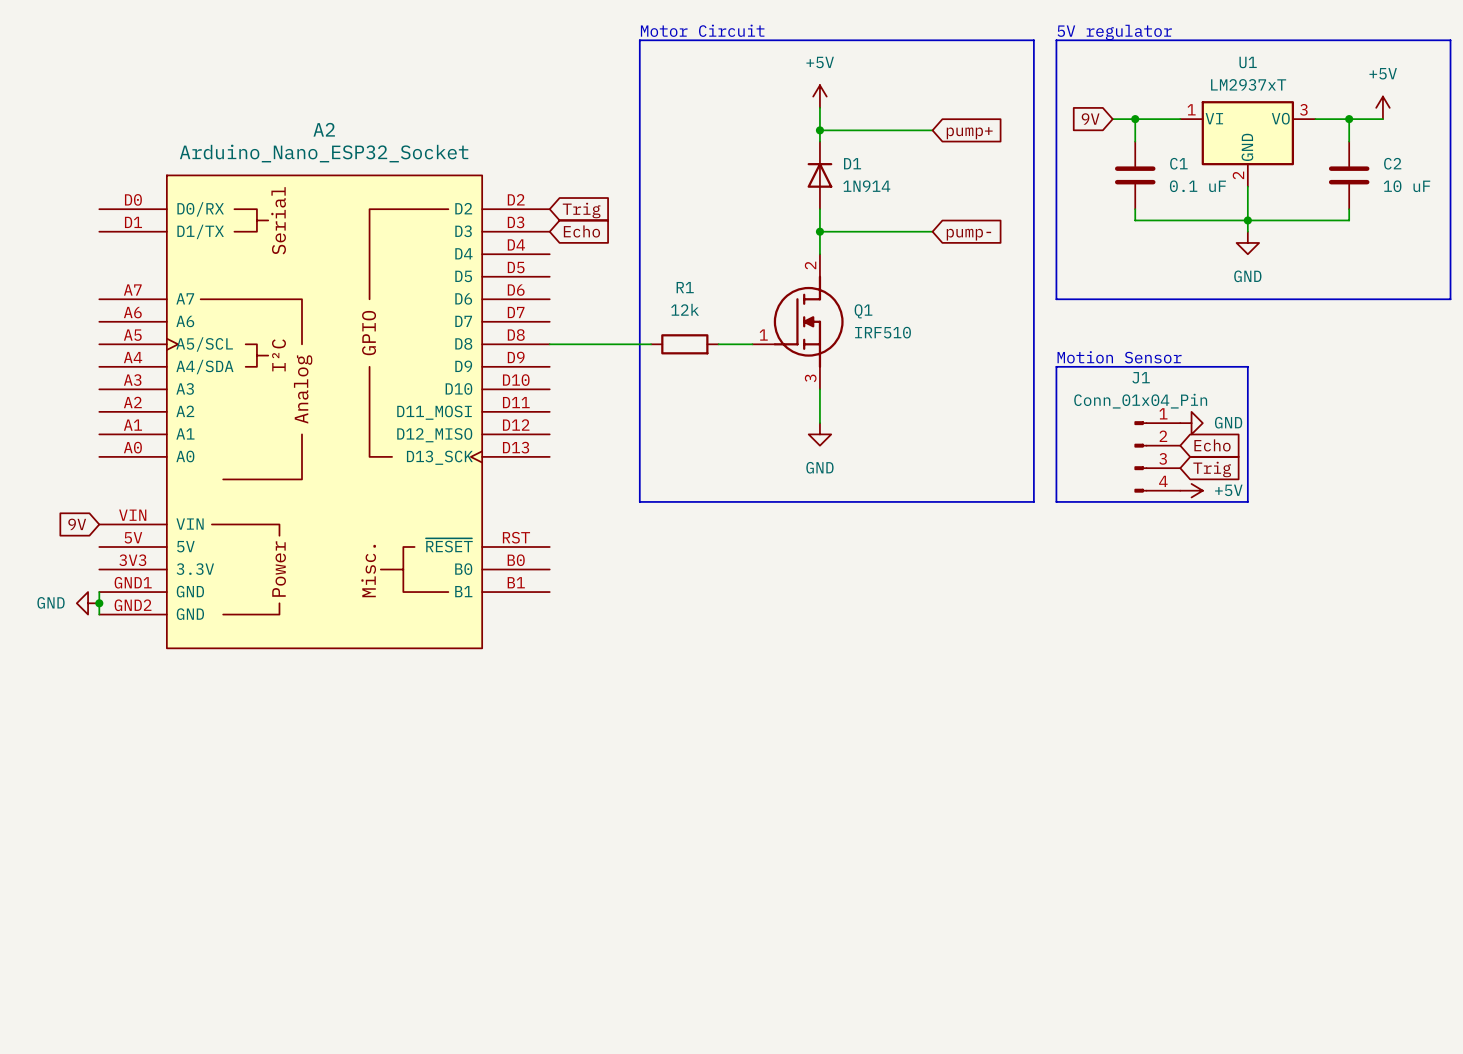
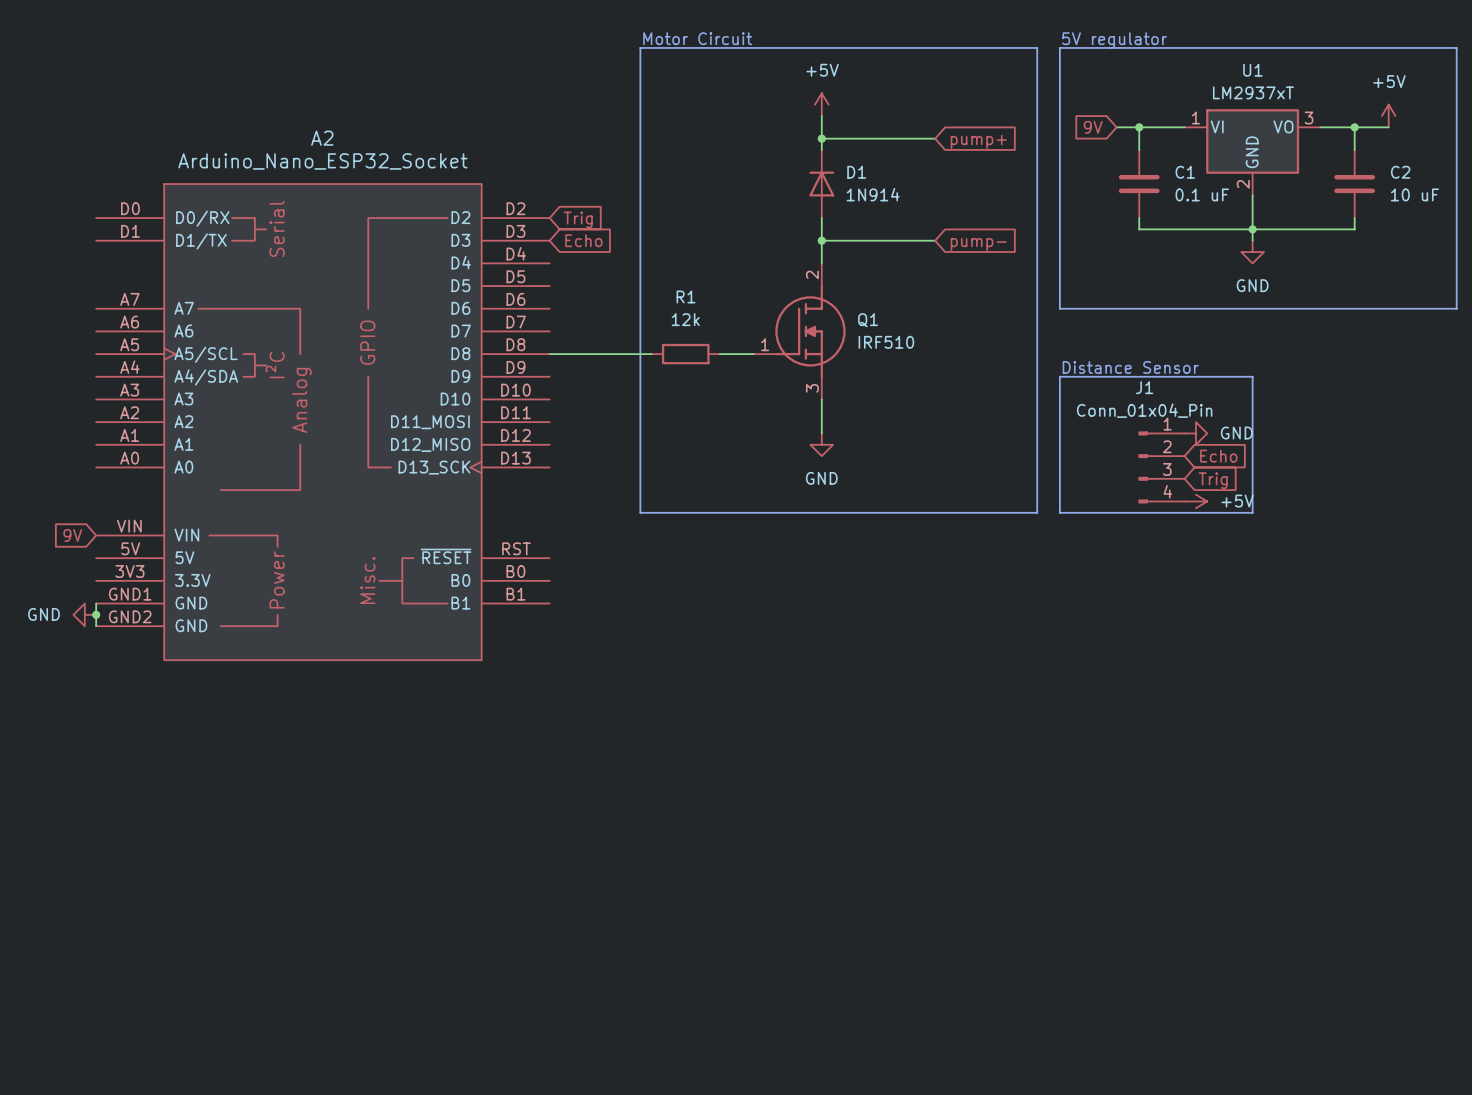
text: Motion Sensor (1119, 357) -> Distance Sensor (1130, 367)

